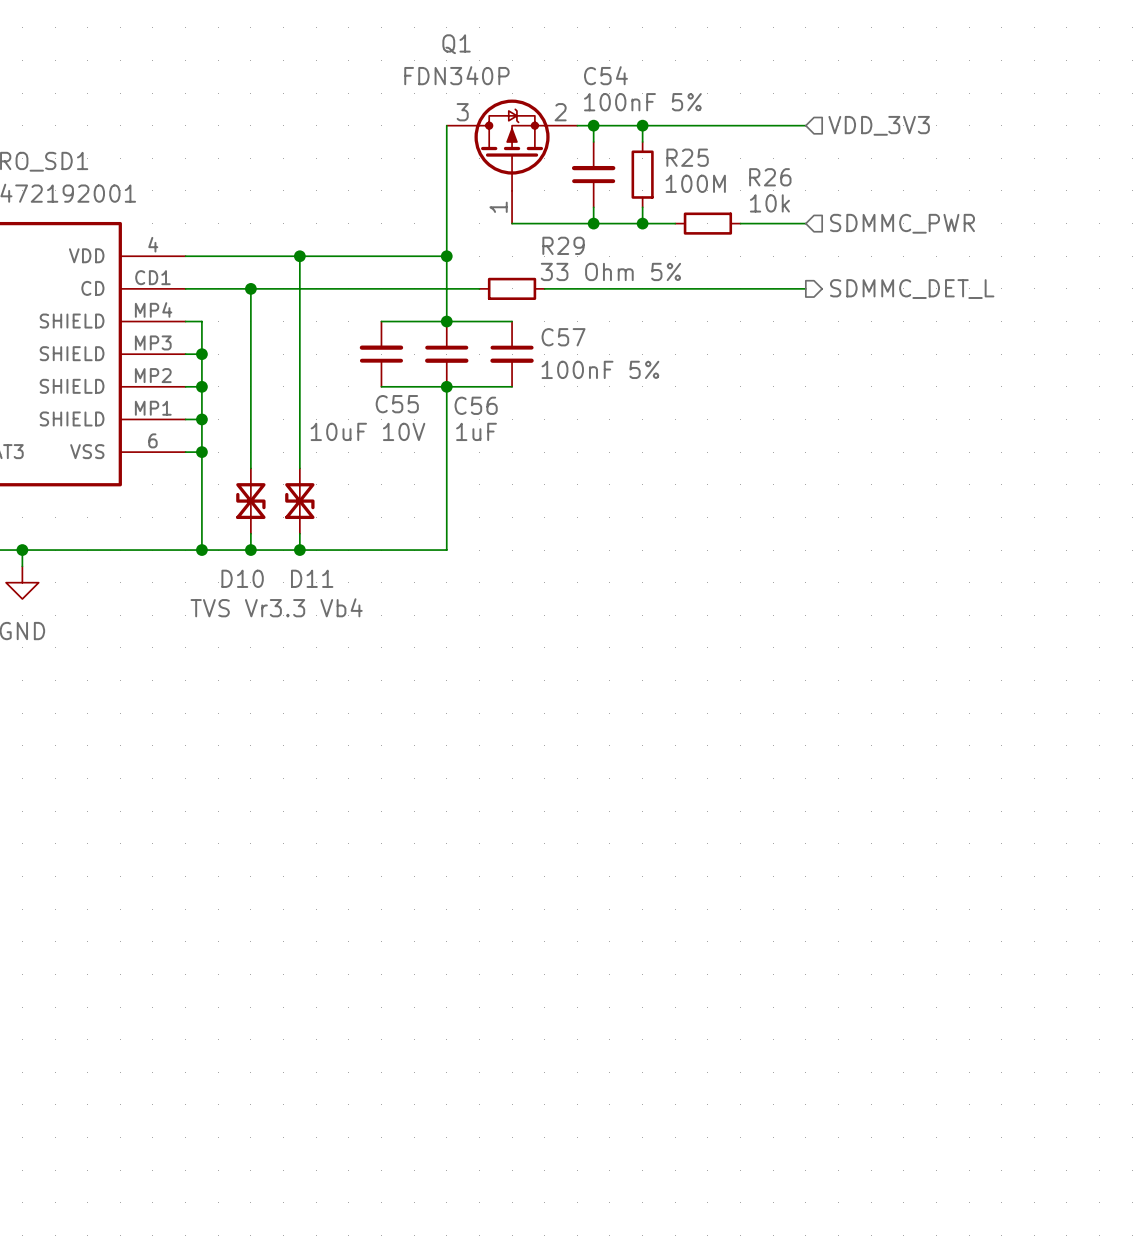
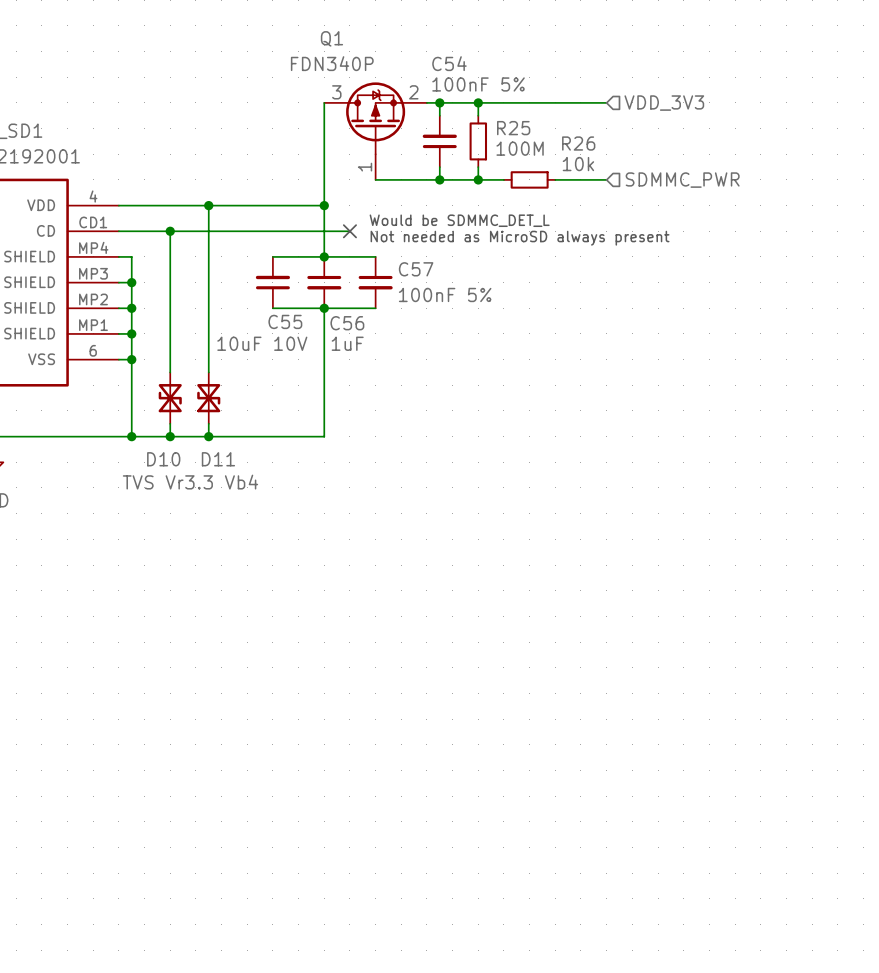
text: none -> Would be SDMMC_DET_L (459, 220)
no-connect mark: none -> (349, 231)
R29: 33 Ohm 5% (512, 288) -> none
wire: (544, 288) (805, 288) -> none
hierarchical label: SDMMC_DET_L (912, 289) -> none
text: none -> Not needed as MicroSD always present (520, 238)

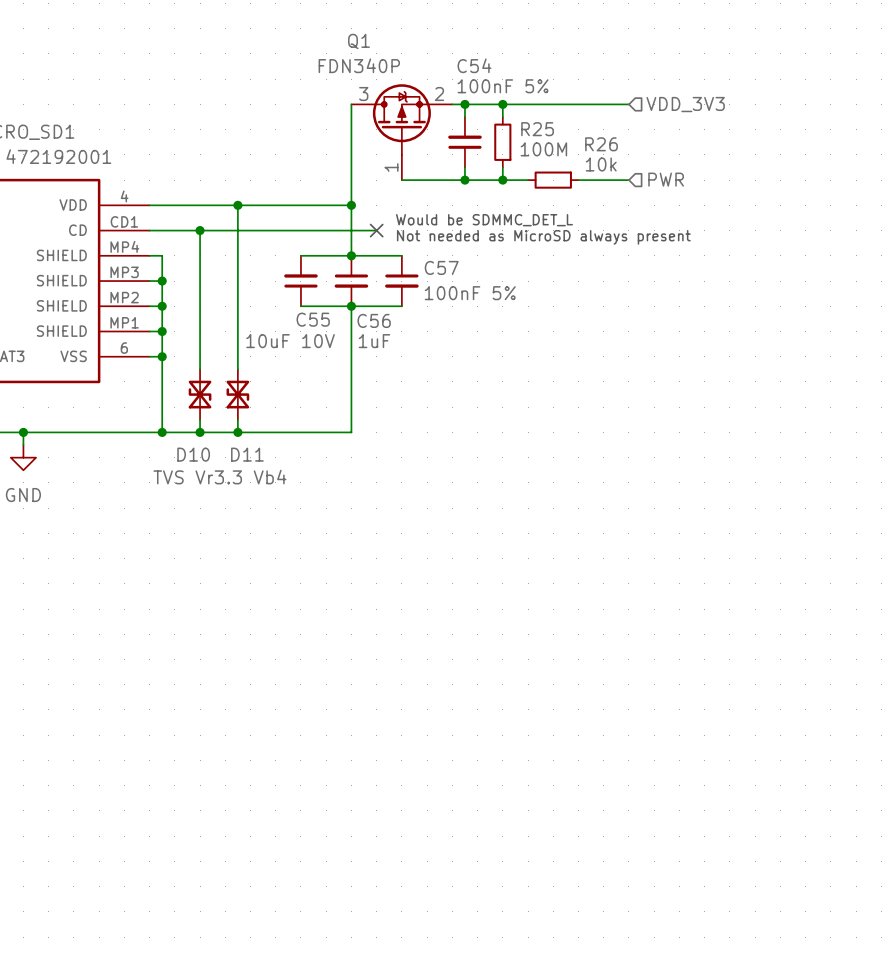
hierarchical label: SDMMC_PWR (682, 180) -> PWR (666, 179)

